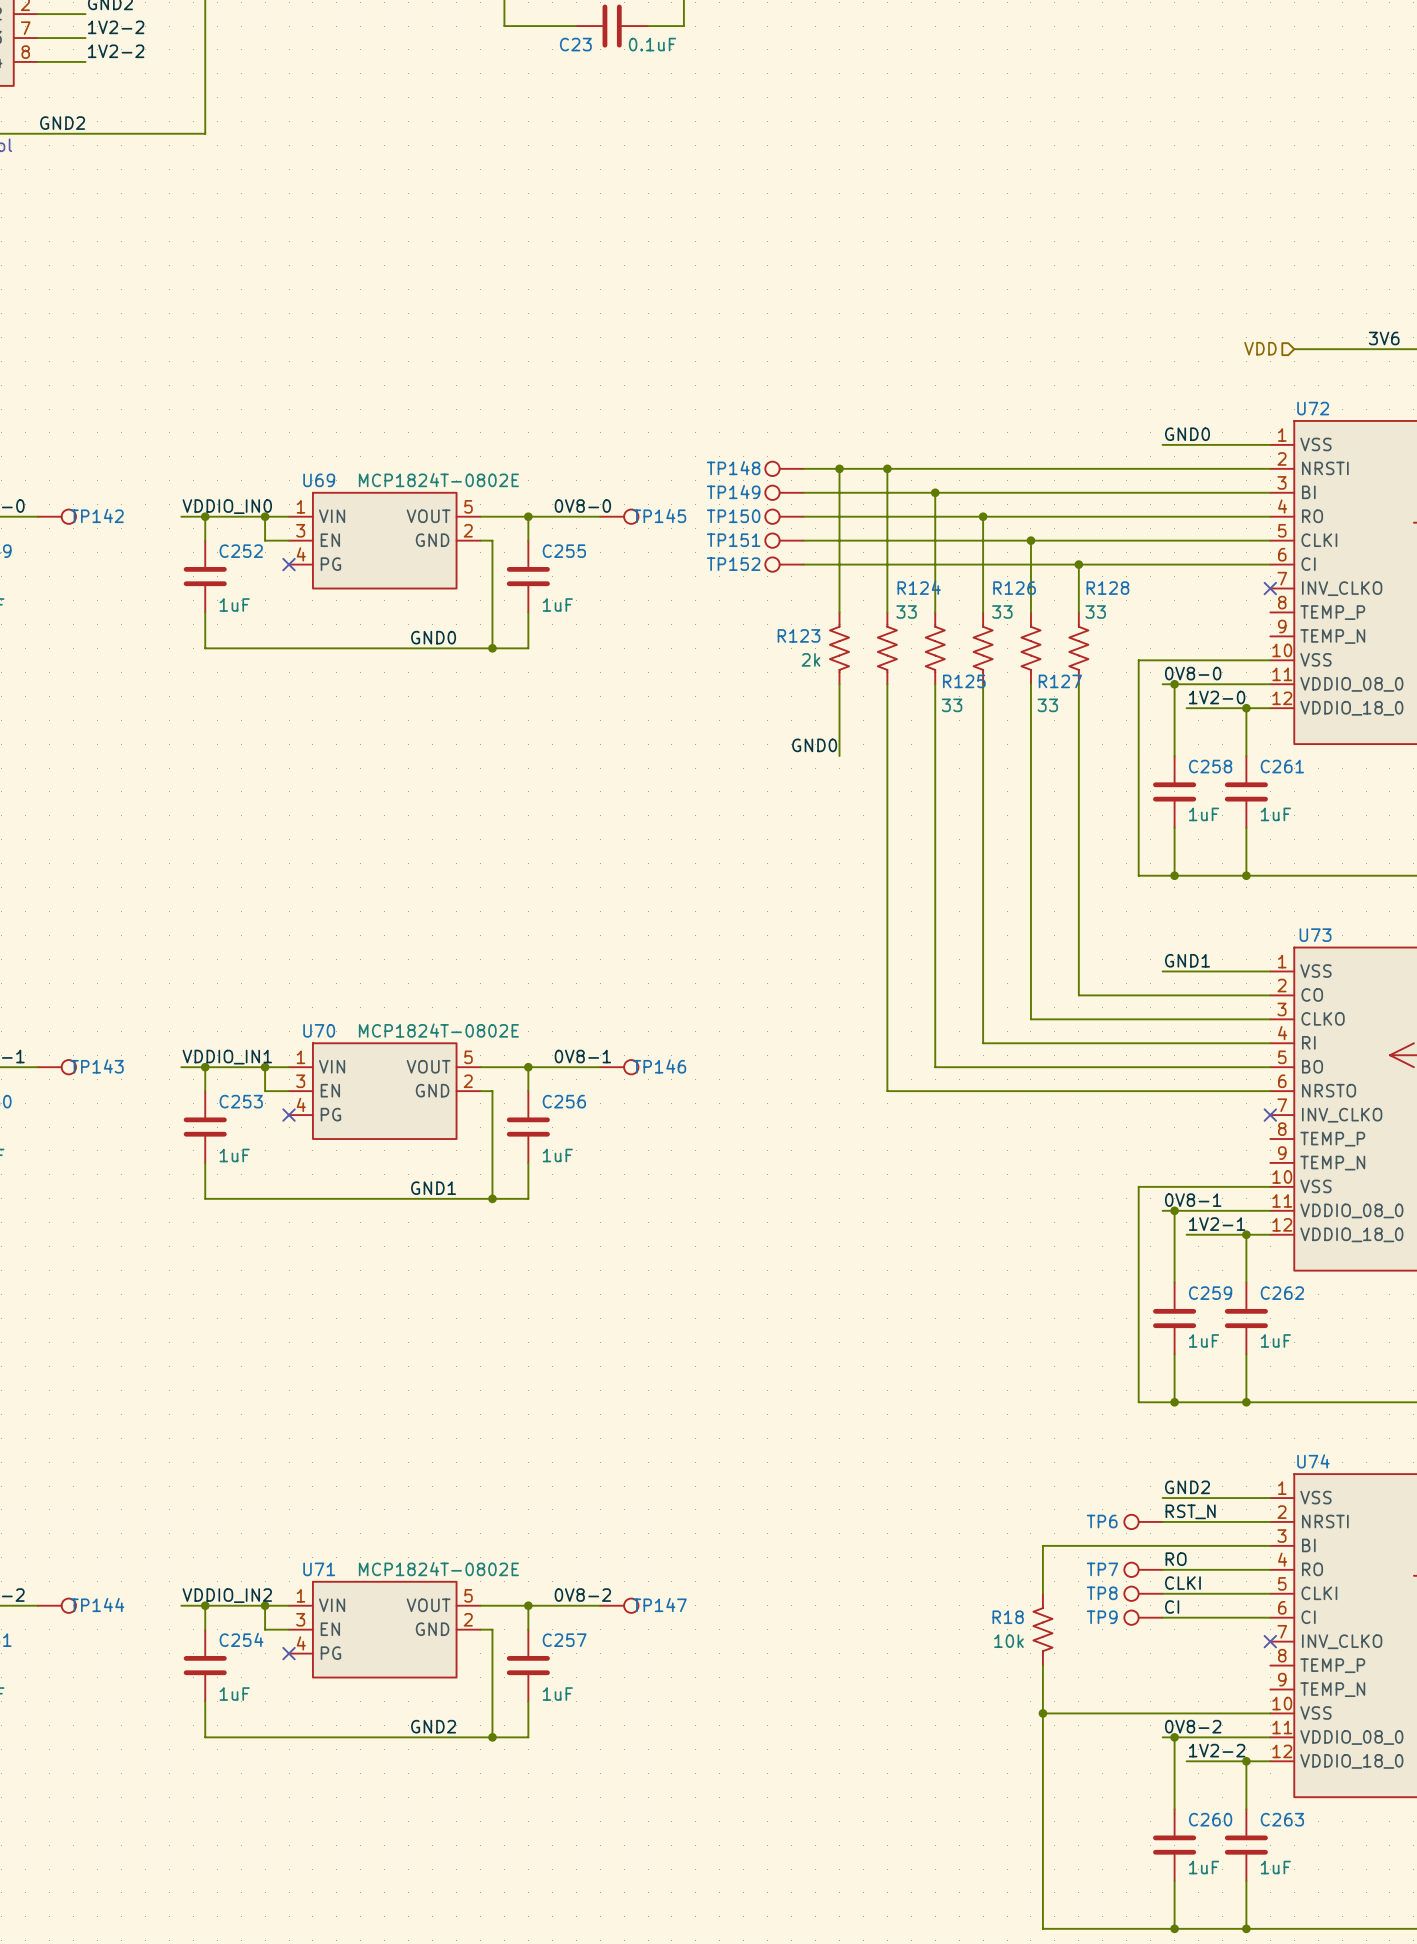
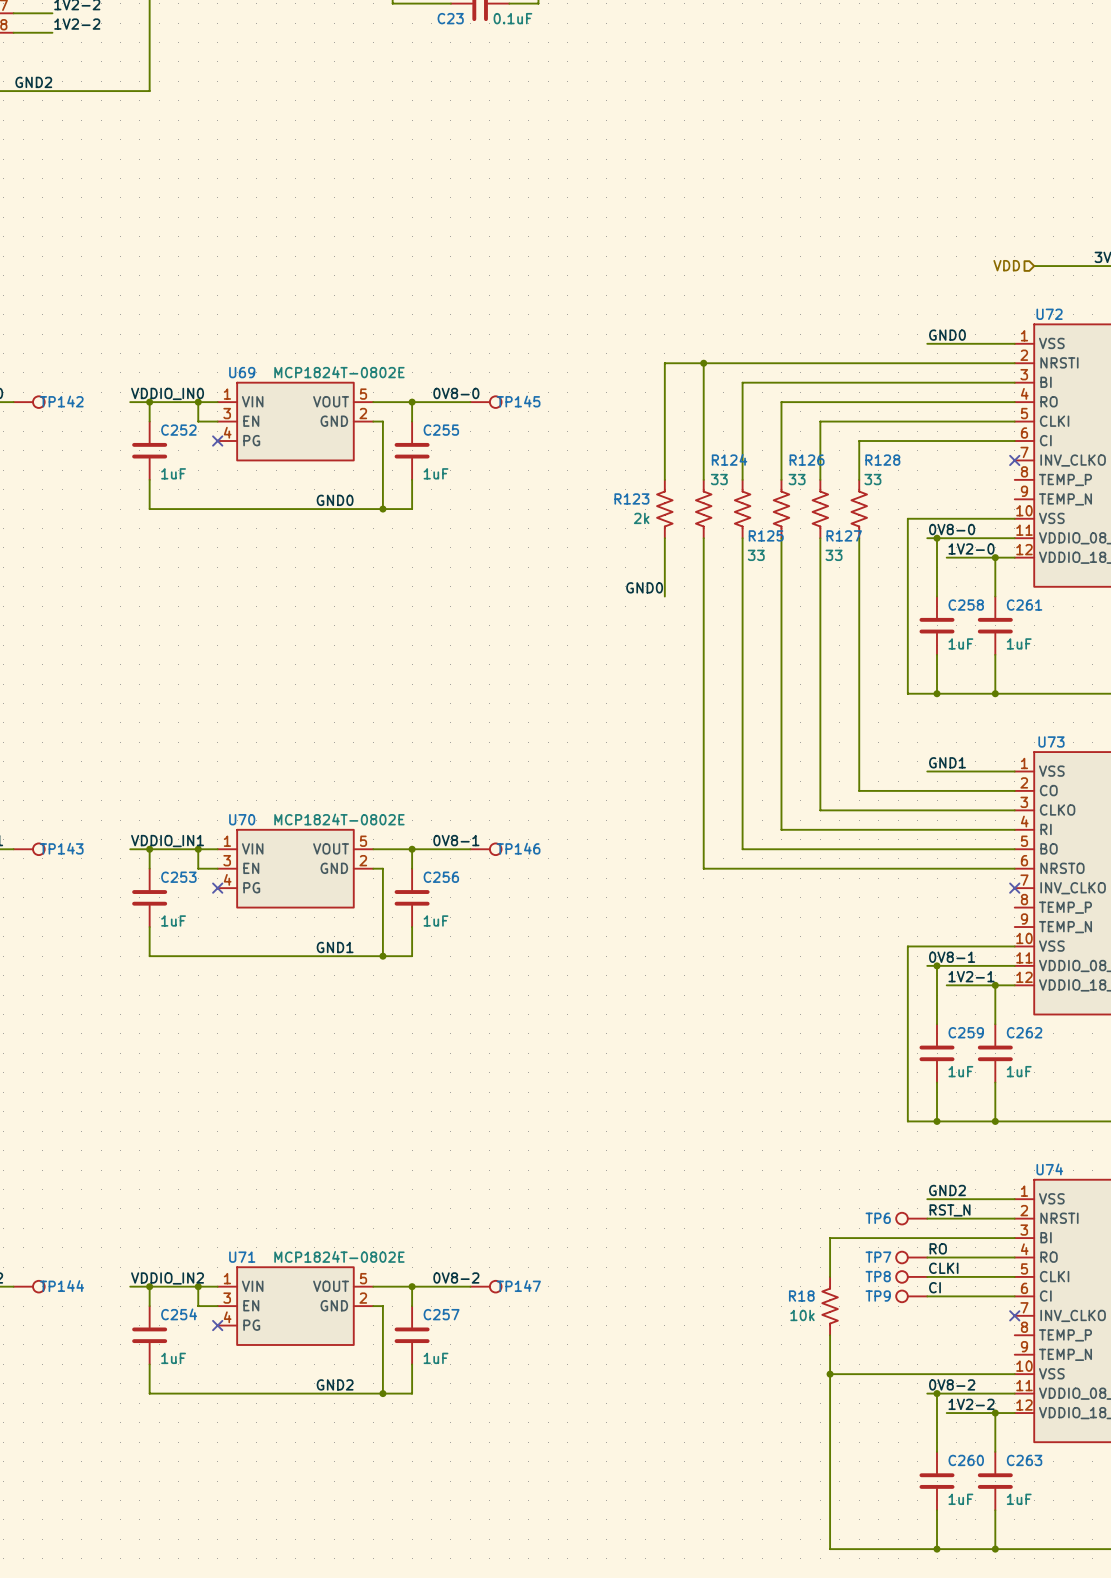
TP148: (784, 468) -> none
wire: (803, 468) (839, 468) -> none
junction: (839, 468) -> none
TP149: (784, 492) -> none
wire: (803, 492) (935, 492) -> none
junction: (935, 492) -> none
TP150: (784, 516) -> none
wire: (803, 516) (983, 516) -> none
junction: (983, 516) -> none
TP151: (784, 540) -> none
wire: (803, 540) (1030, 540) -> none
junction: (1030, 540) -> none
TP152: (784, 564) -> none
wire: (803, 564) (1078, 564) -> none
junction: (1078, 564) -> none

